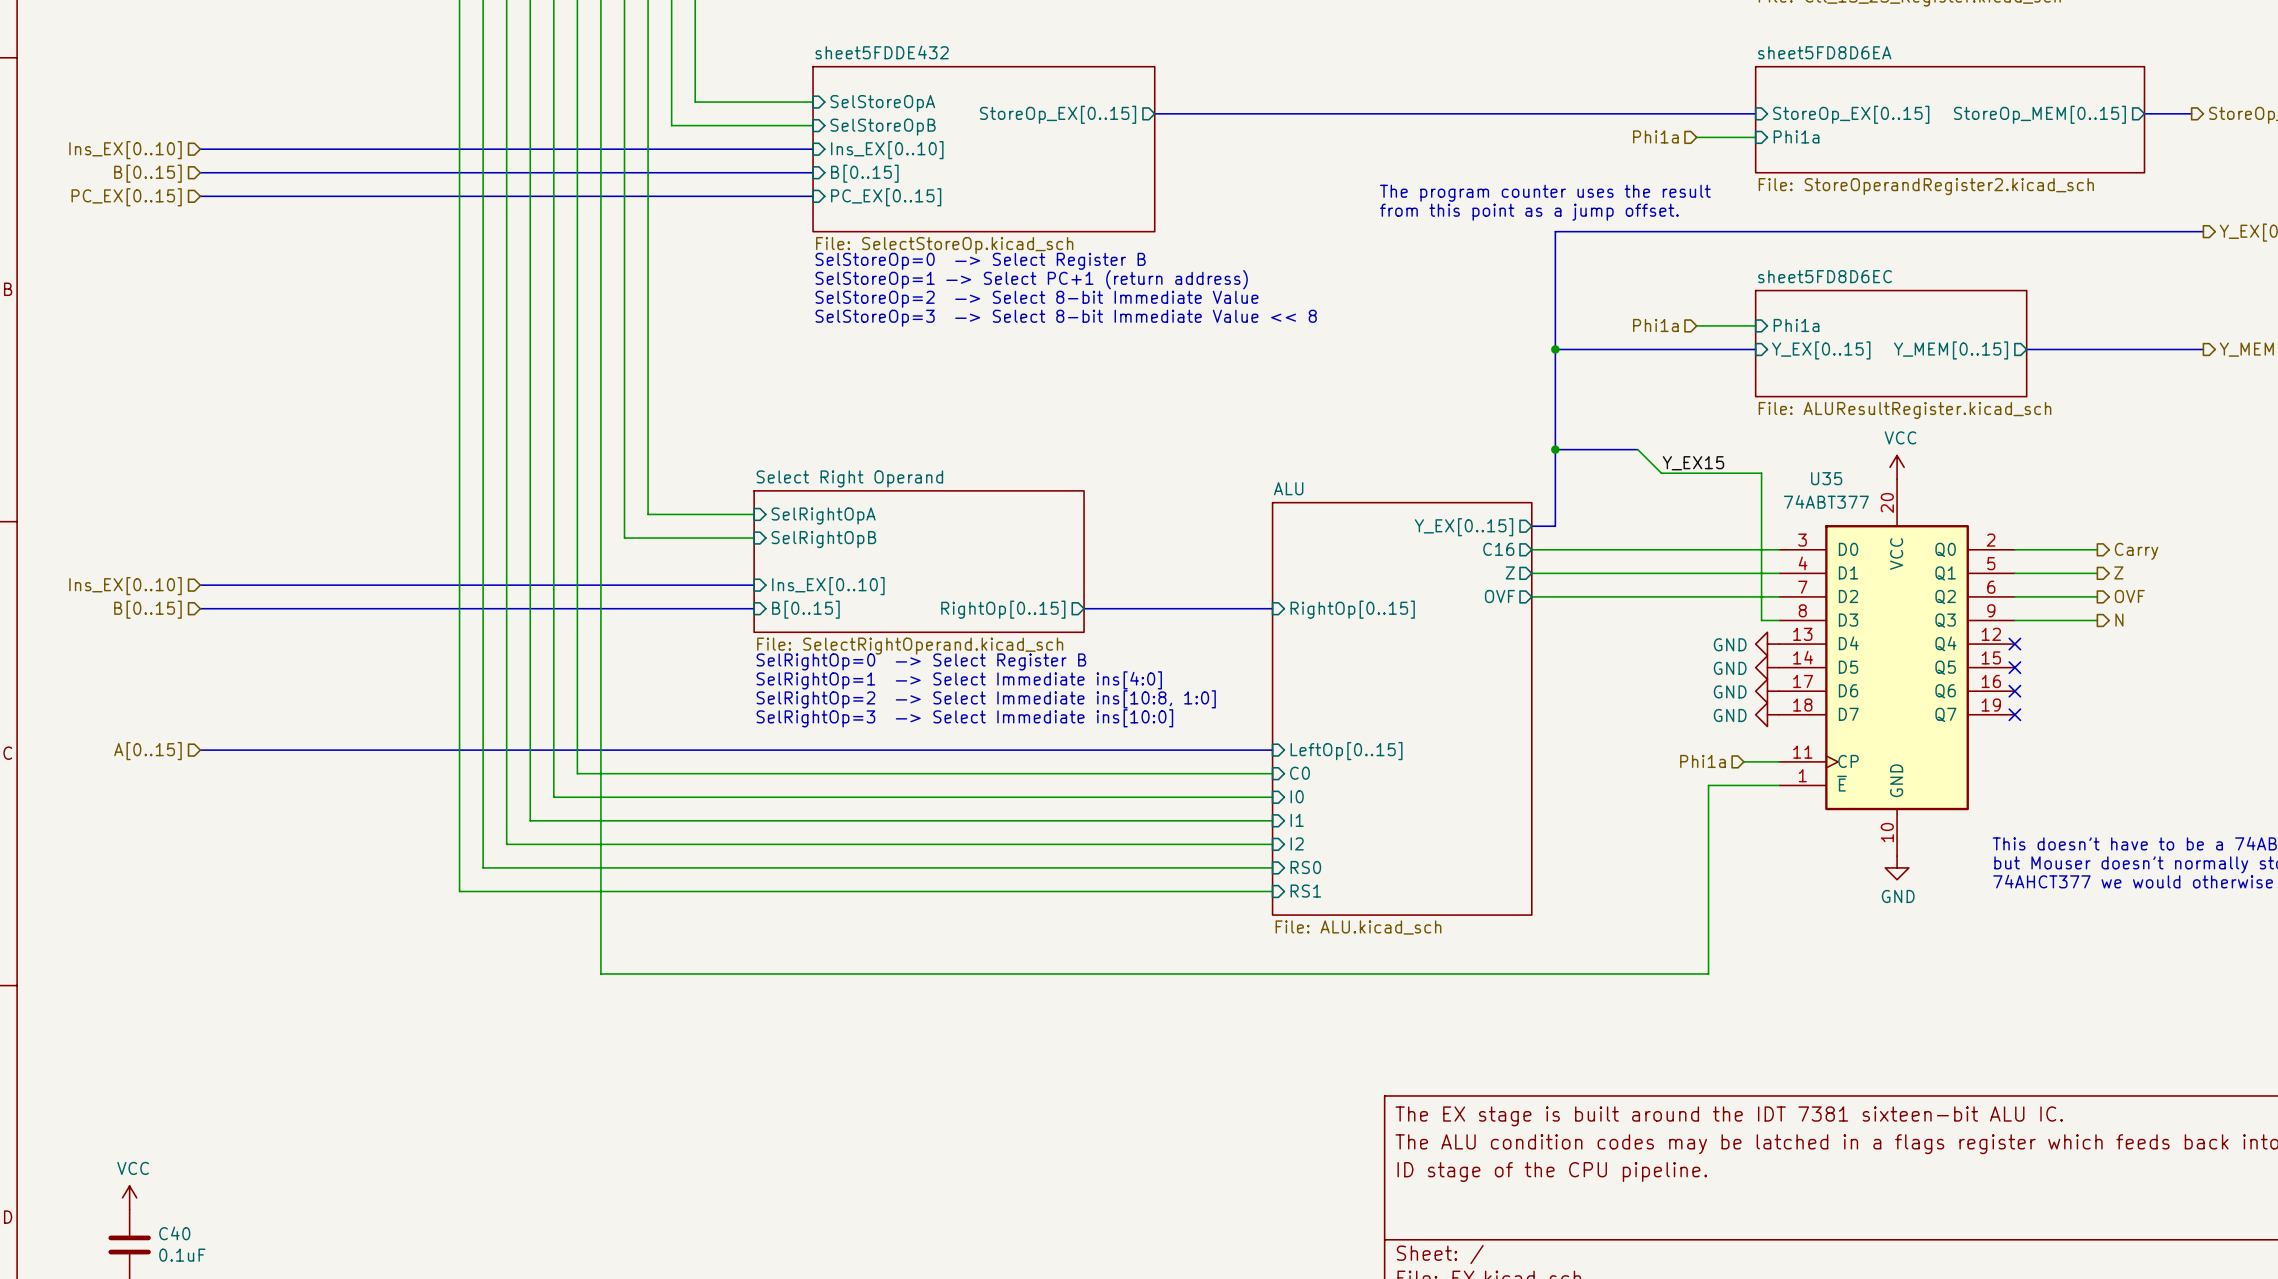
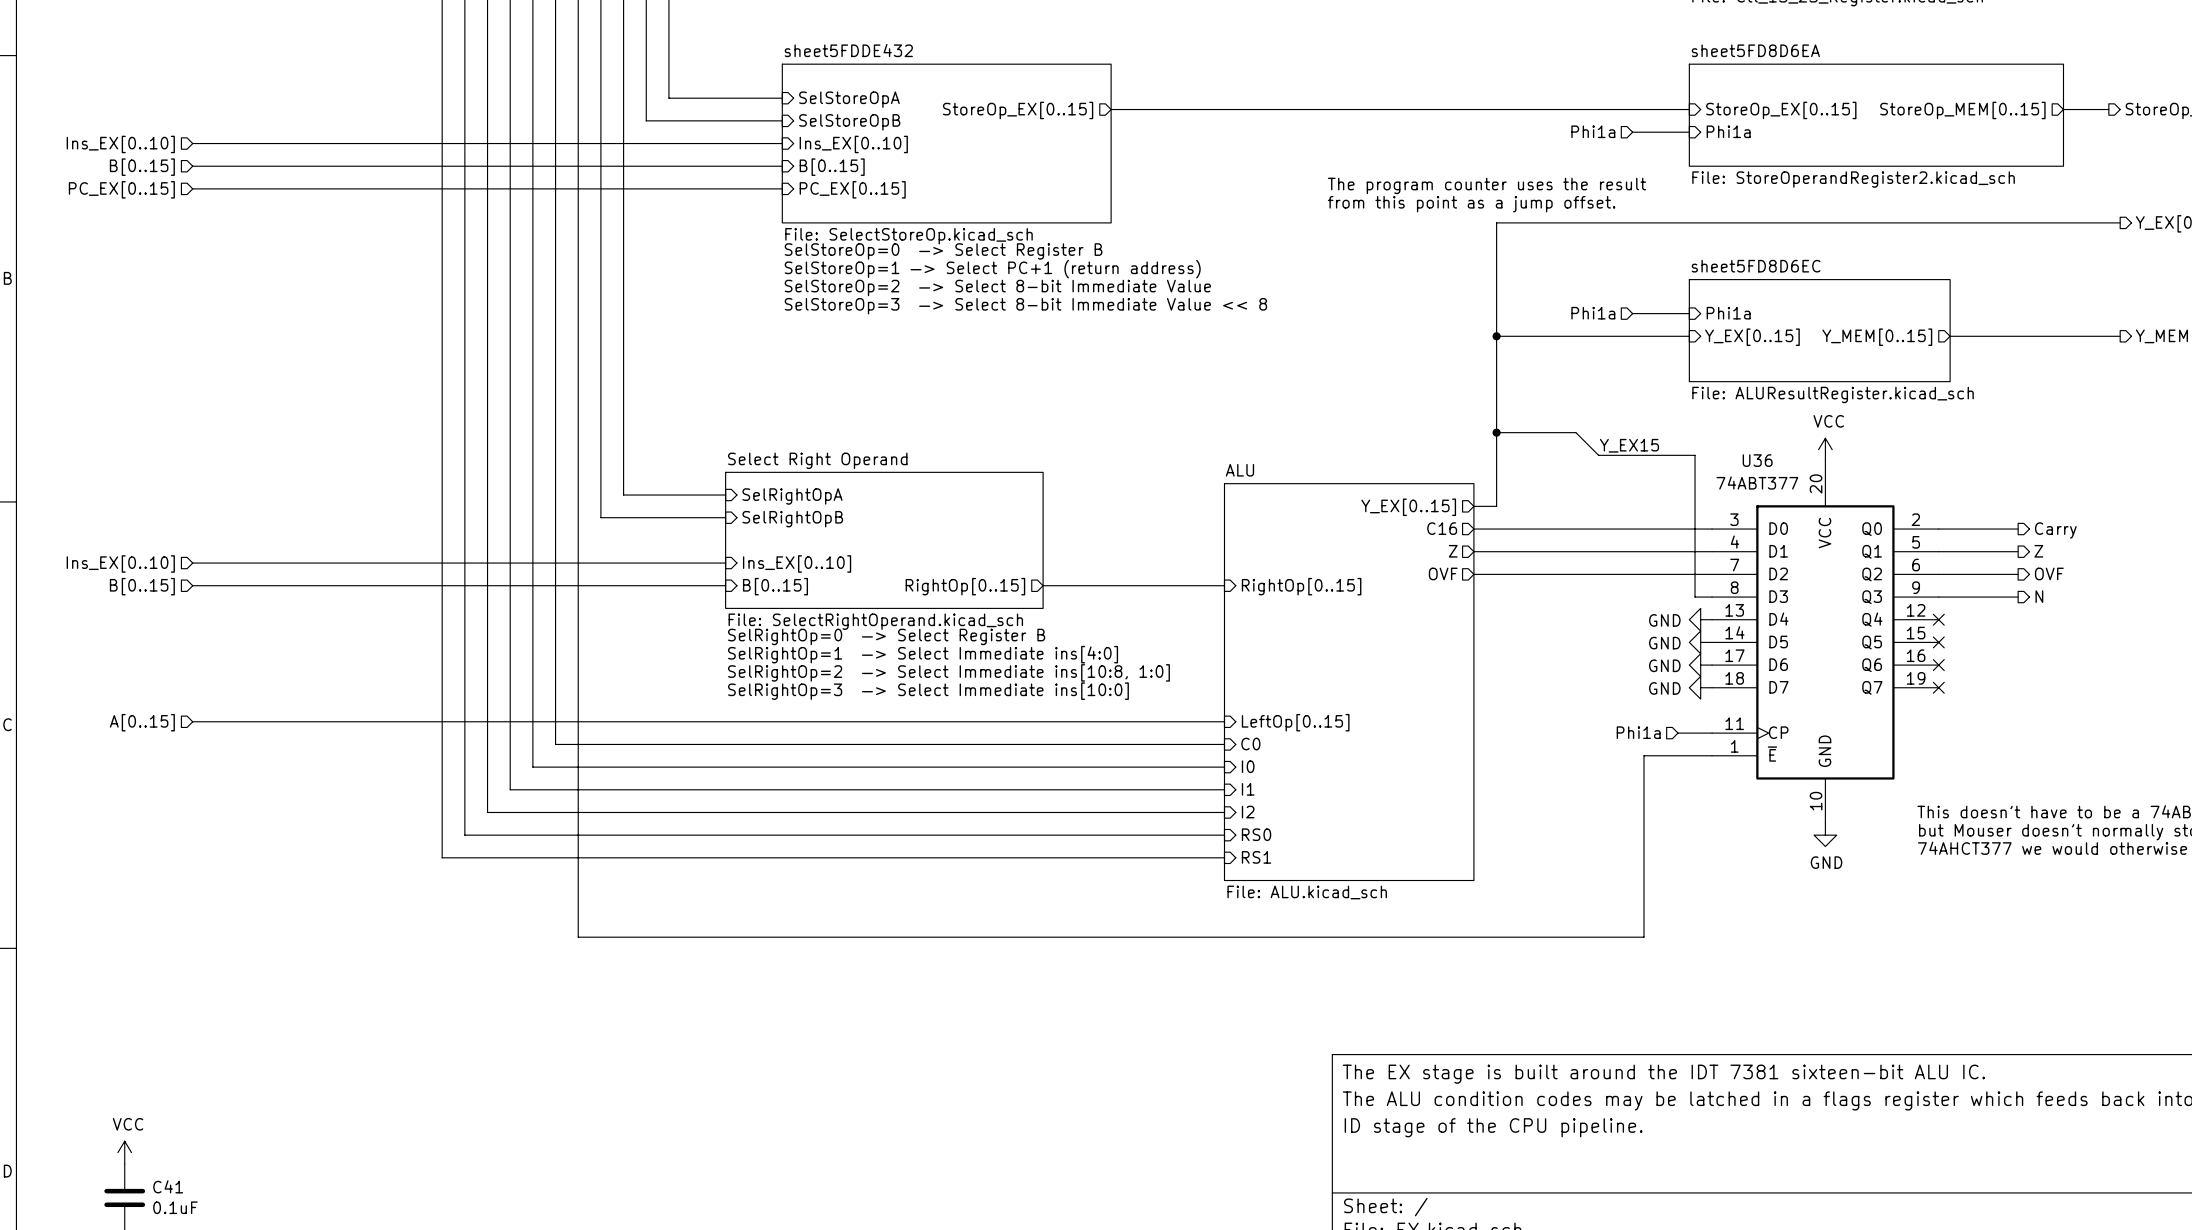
U35 name: U35 (1826, 478) -> U36 (1757, 460)
C40 name: C40 (174, 1233) -> C41 (168, 1186)

